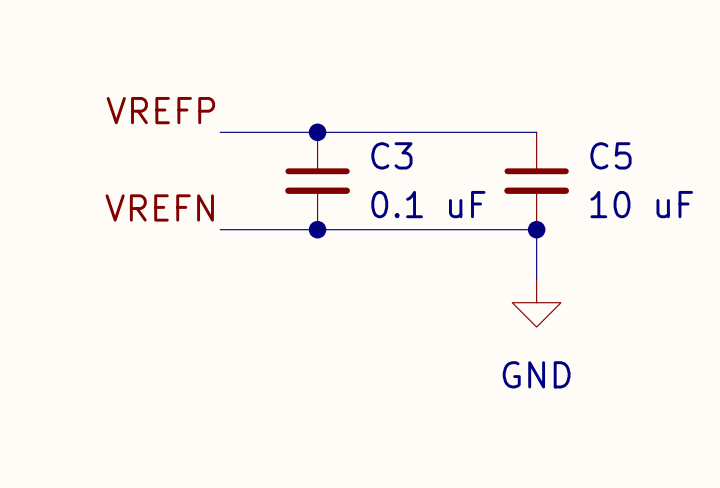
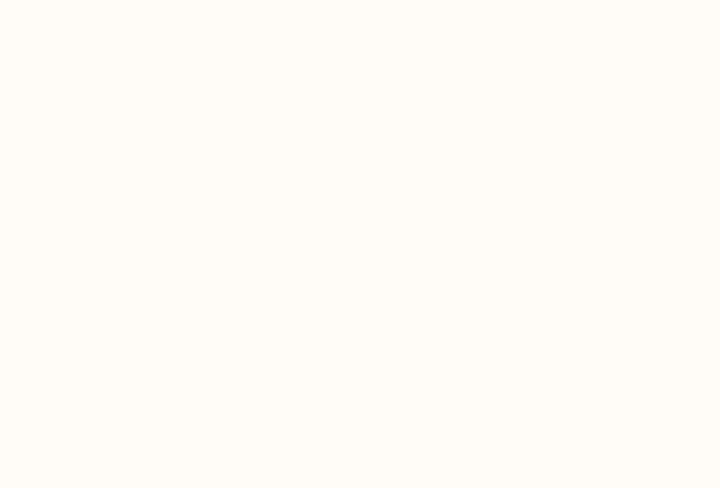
label: VREFP (160, 110) -> none
wire: (220, 132) (536, 132) -> none
junction: (317, 132) -> none
C3: 0.1 uF (317, 181) -> none
C5: 10 uF (536, 181) -> none
label: VREFN (159, 207) -> none
wire: (220, 229) (536, 229) (536, 278) -> none
junction: (317, 229) -> none
junction: (536, 229) -> none
power symbol: GND (536, 302) -> none

